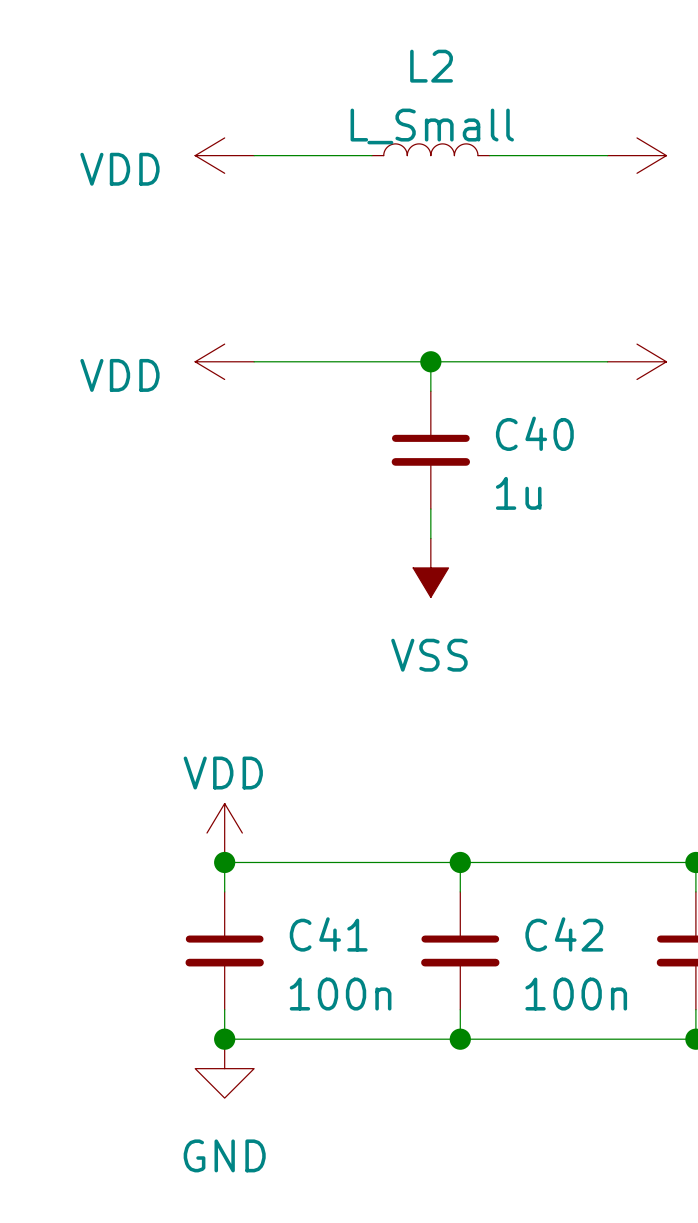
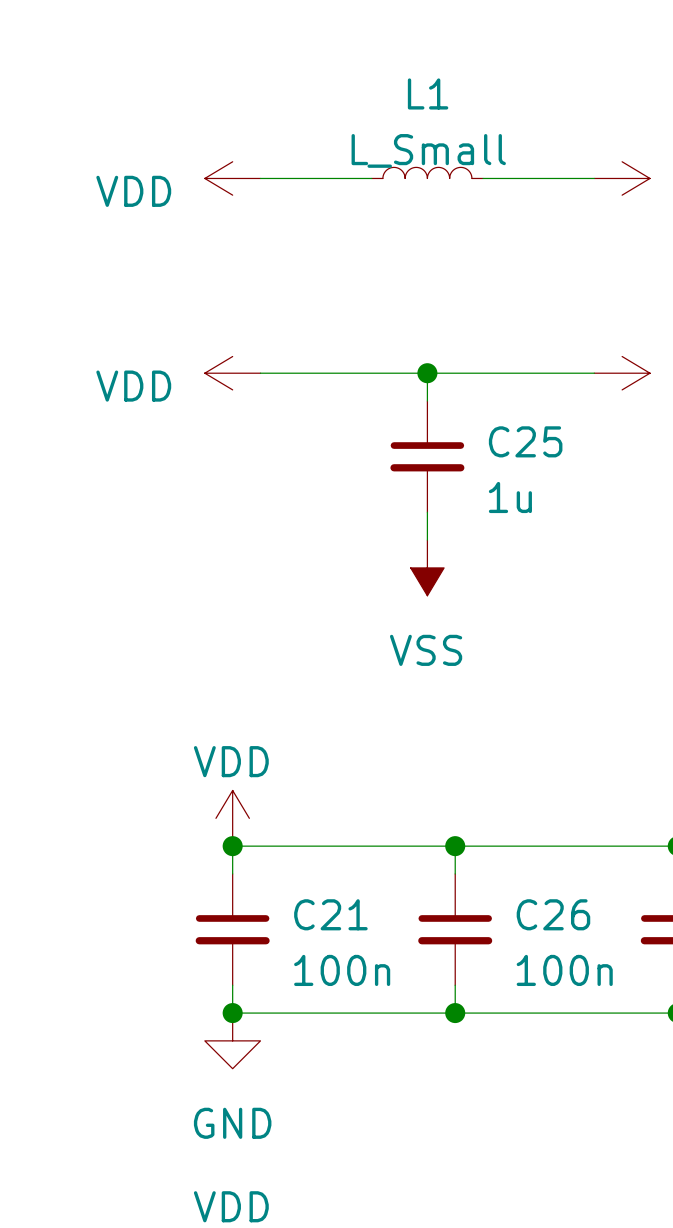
L2 name: L2 (431, 66) -> L1 (428, 93)
C40 name: C40 (534, 433) -> C25 (525, 441)
C41 name: C41 (328, 934) -> C21 (330, 914)
C42 name: C42 (564, 934) -> C26 (553, 914)

